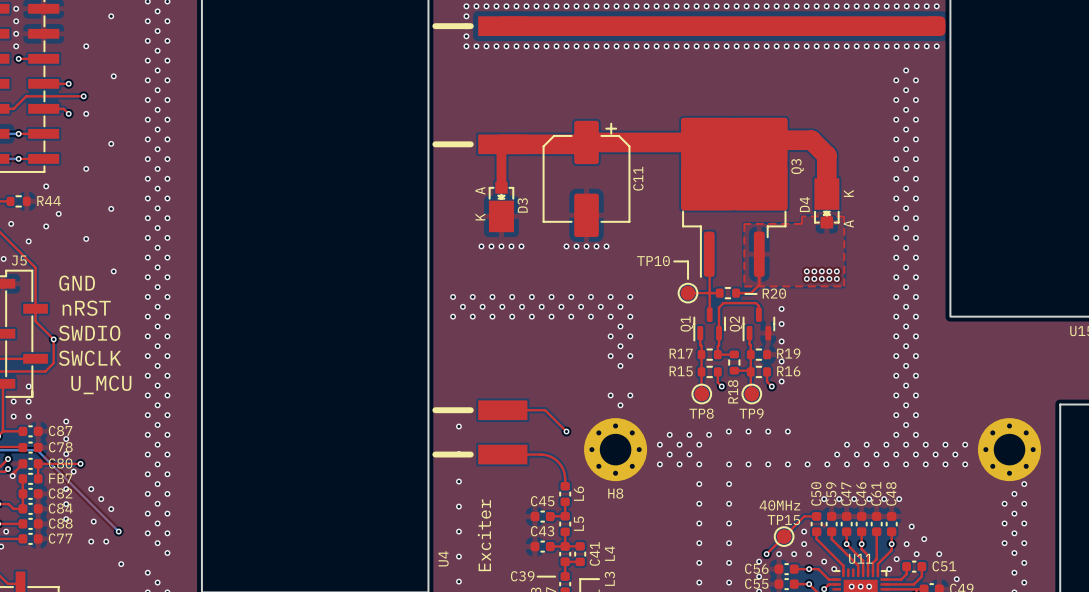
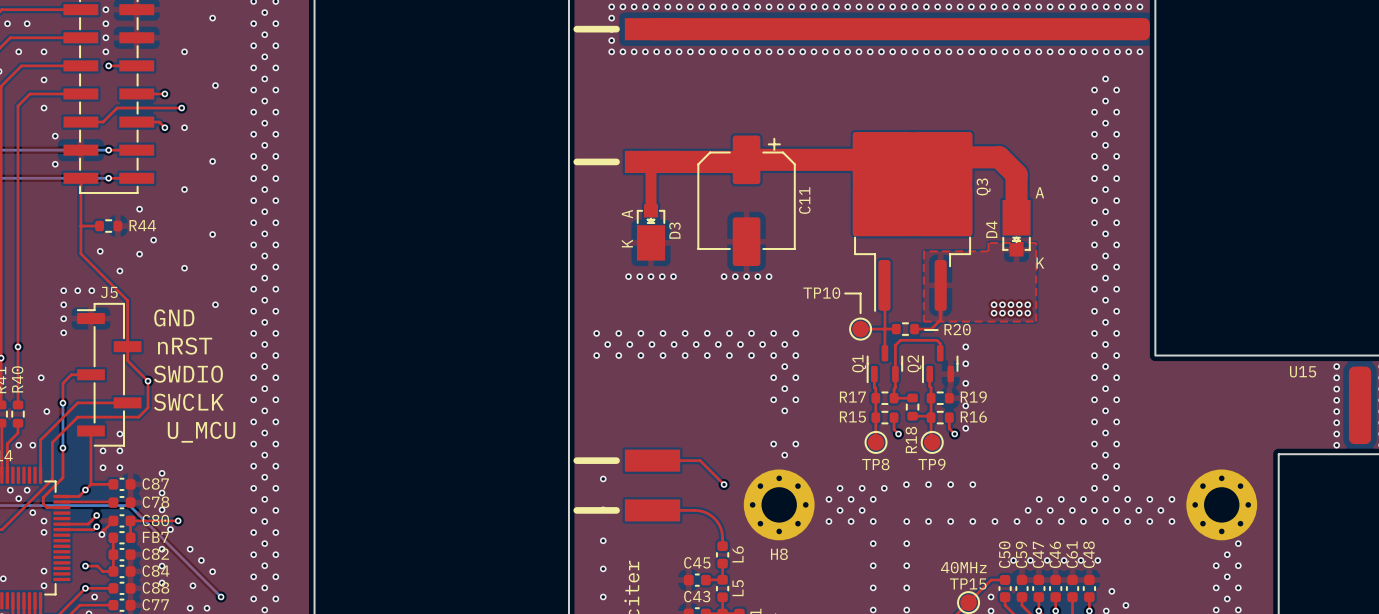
D4 text rotation: 0° (848, 193) -> 90° clockwise (1040, 263)
D4 text position: K (848, 193) -> K (1040, 263)
D4 text rotation: 0° (848, 223) -> 90° clockwise (1039, 192)
D4 text position: A (848, 223) -> A (1039, 192)

